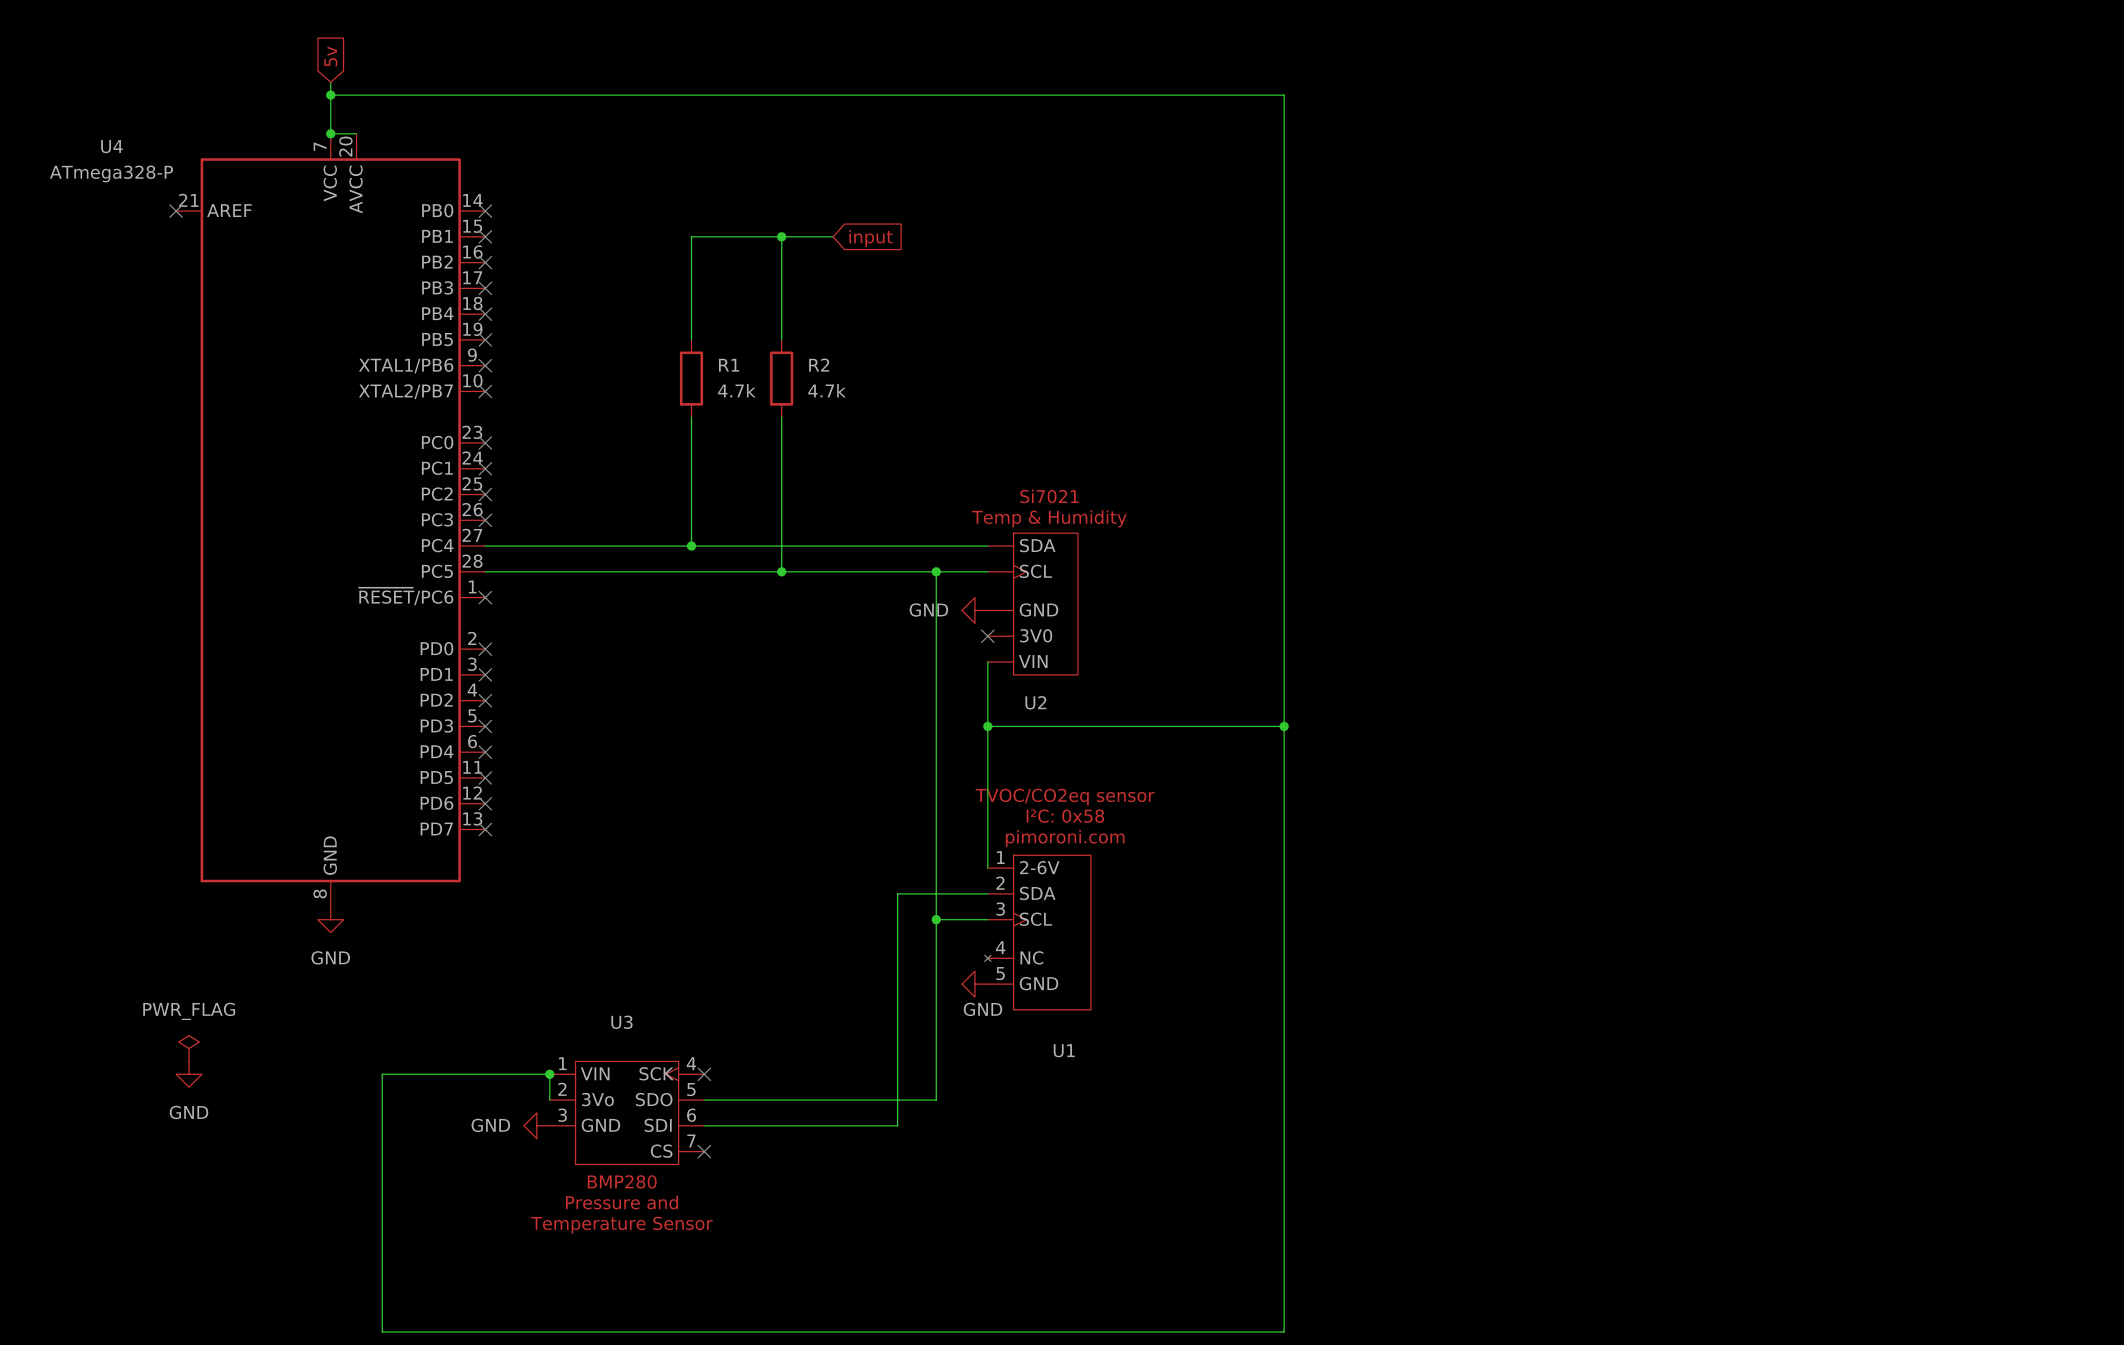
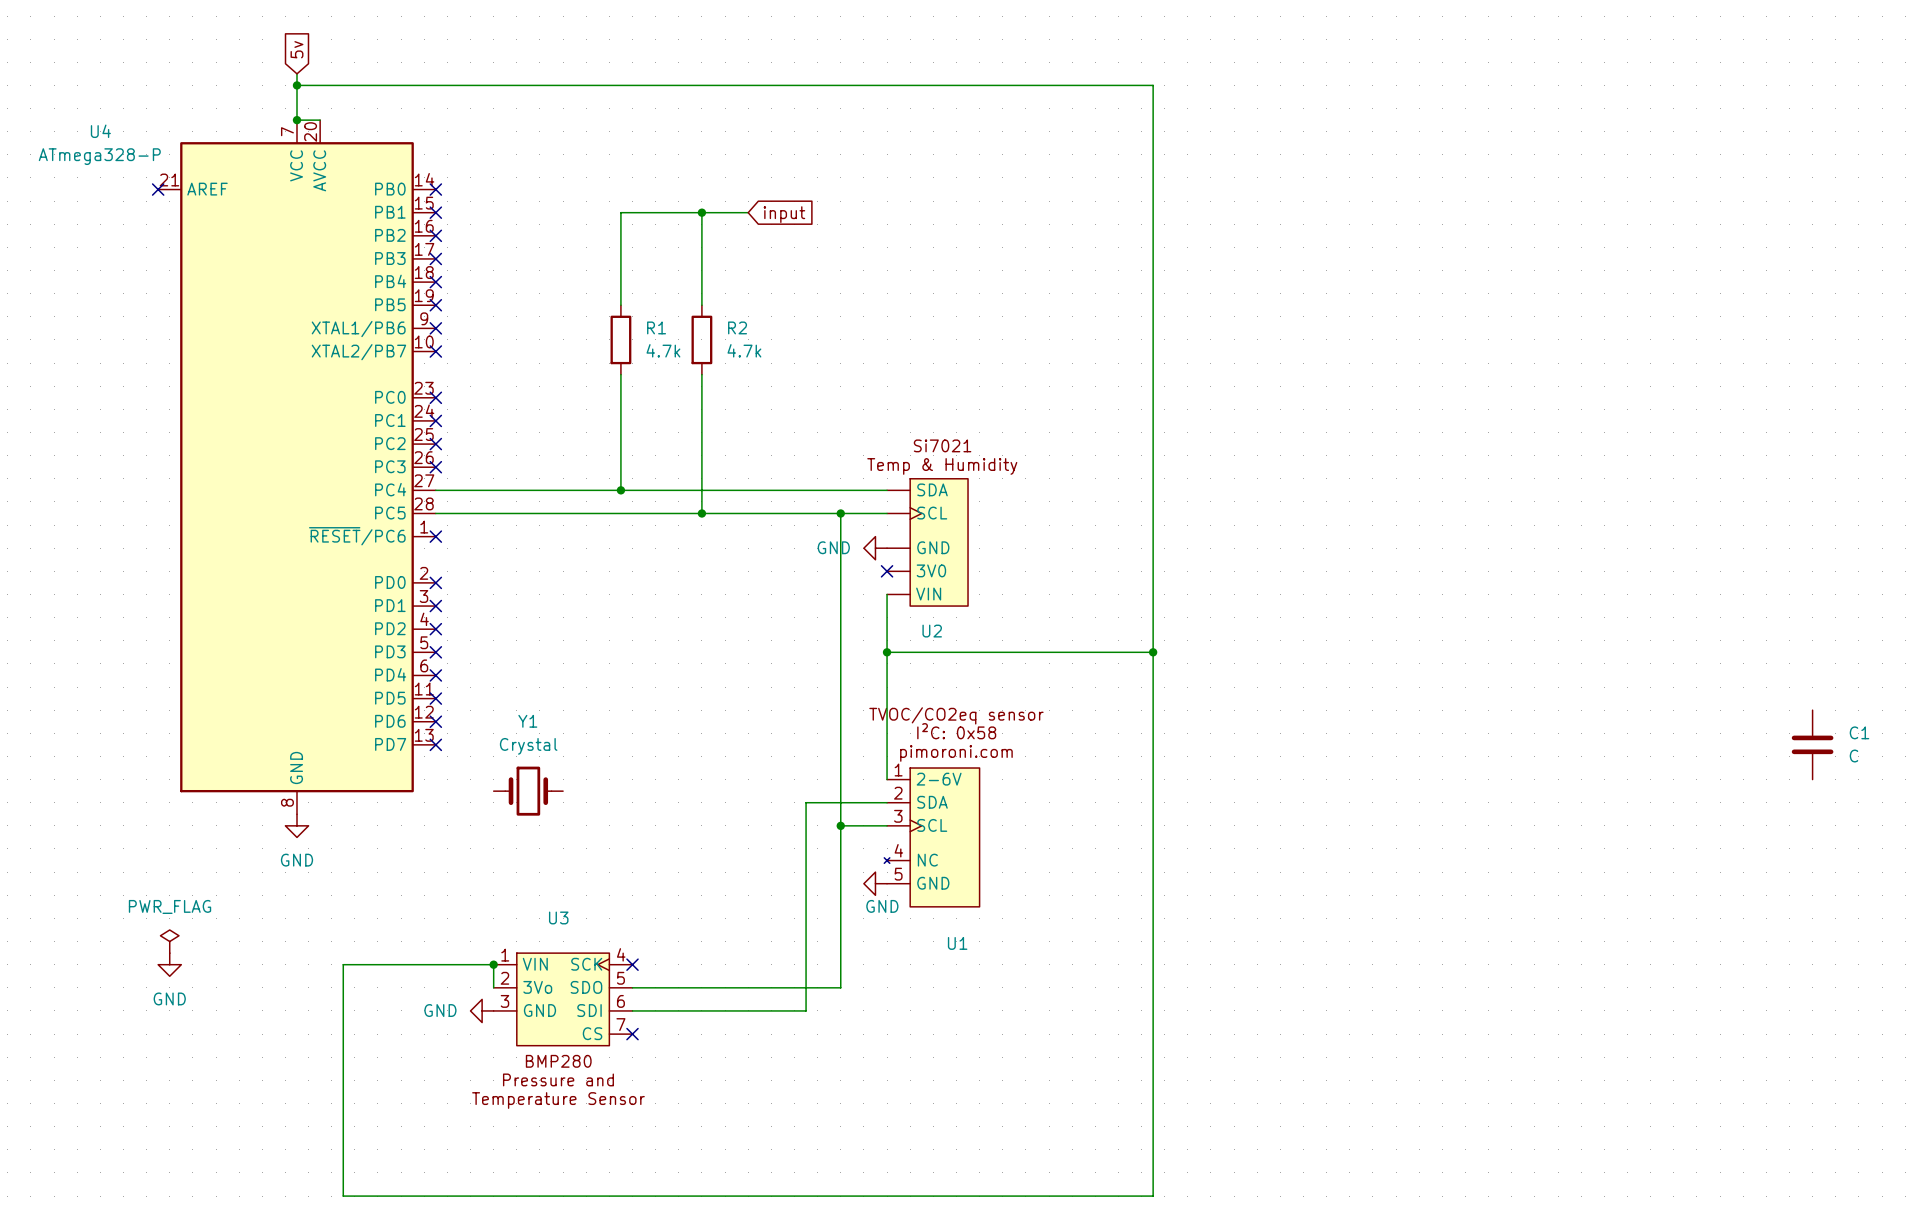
C1: none -> C (1812, 744)
Y1: none -> Crystal (528, 791)

